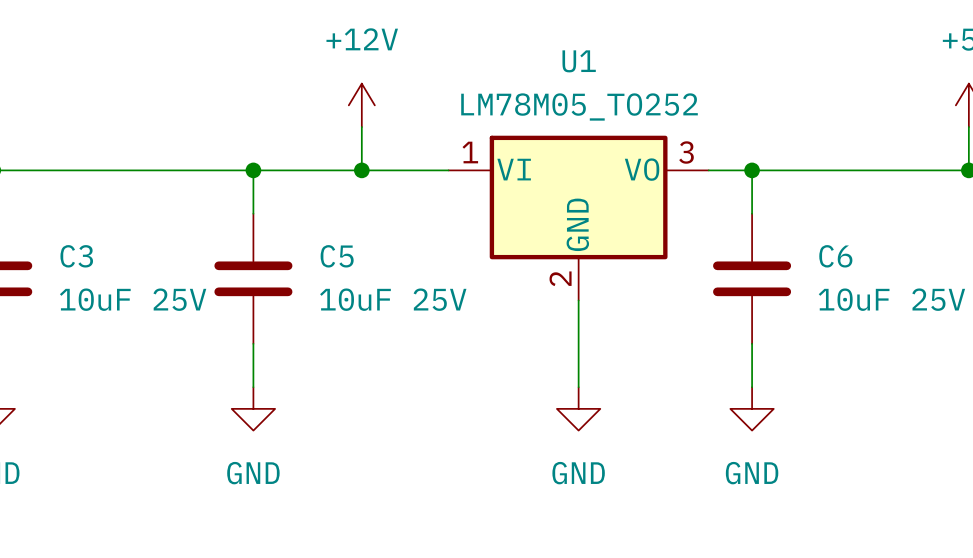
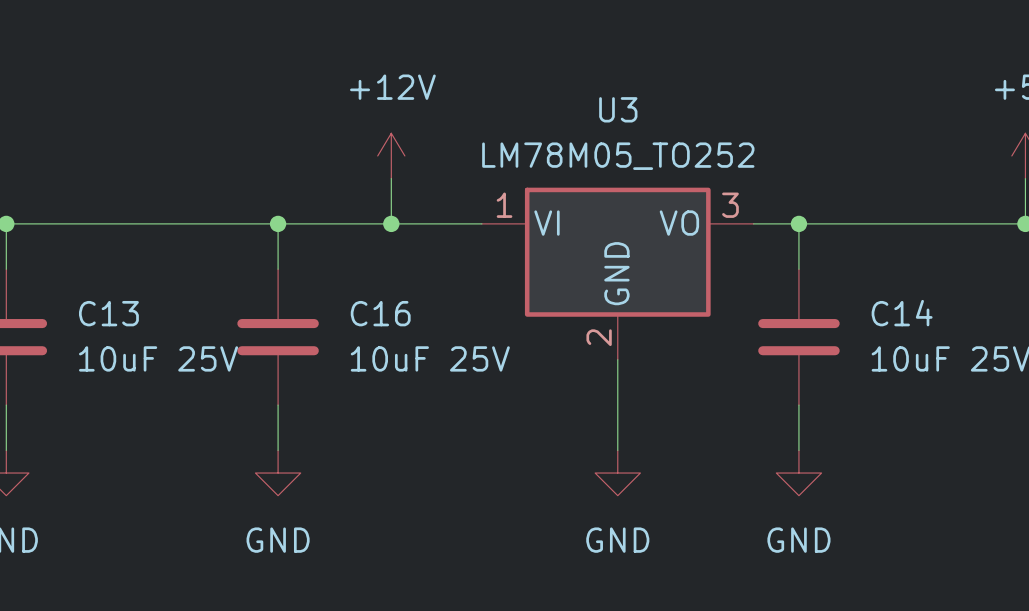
U1 name: U1 (579, 61) -> U3 (618, 109)
C3 name: C3 (76, 256) -> C13 (108, 313)
C5 name: C5 (337, 256) -> C16 (380, 313)
C6 name: C6 (835, 256) -> C14 (902, 313)

